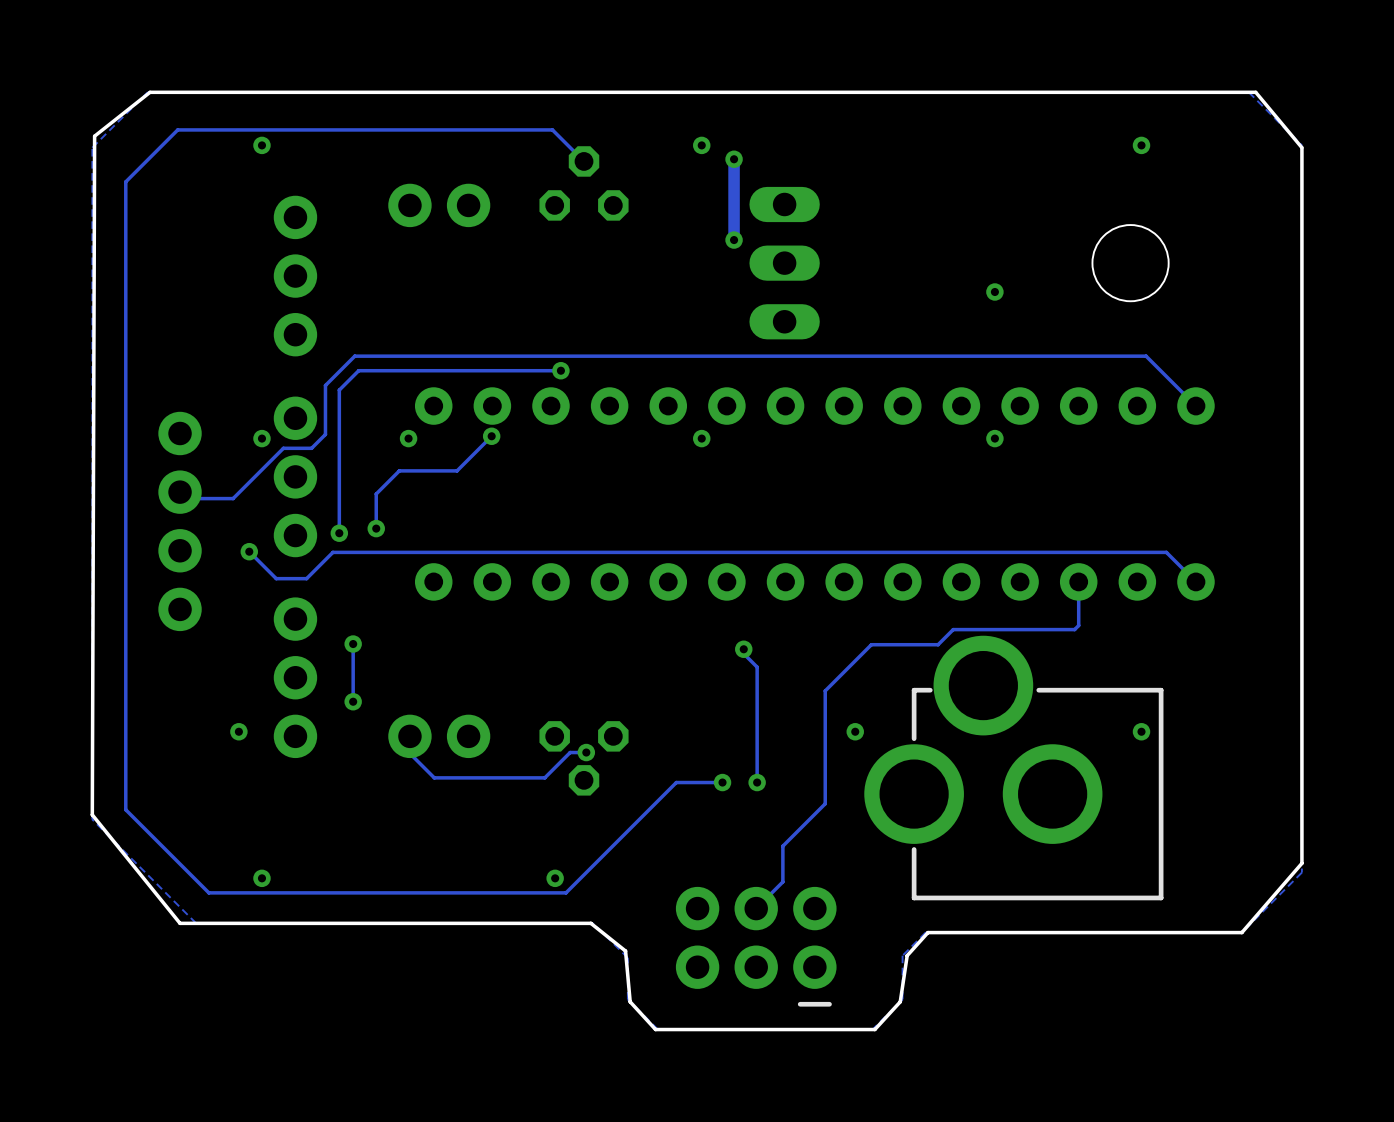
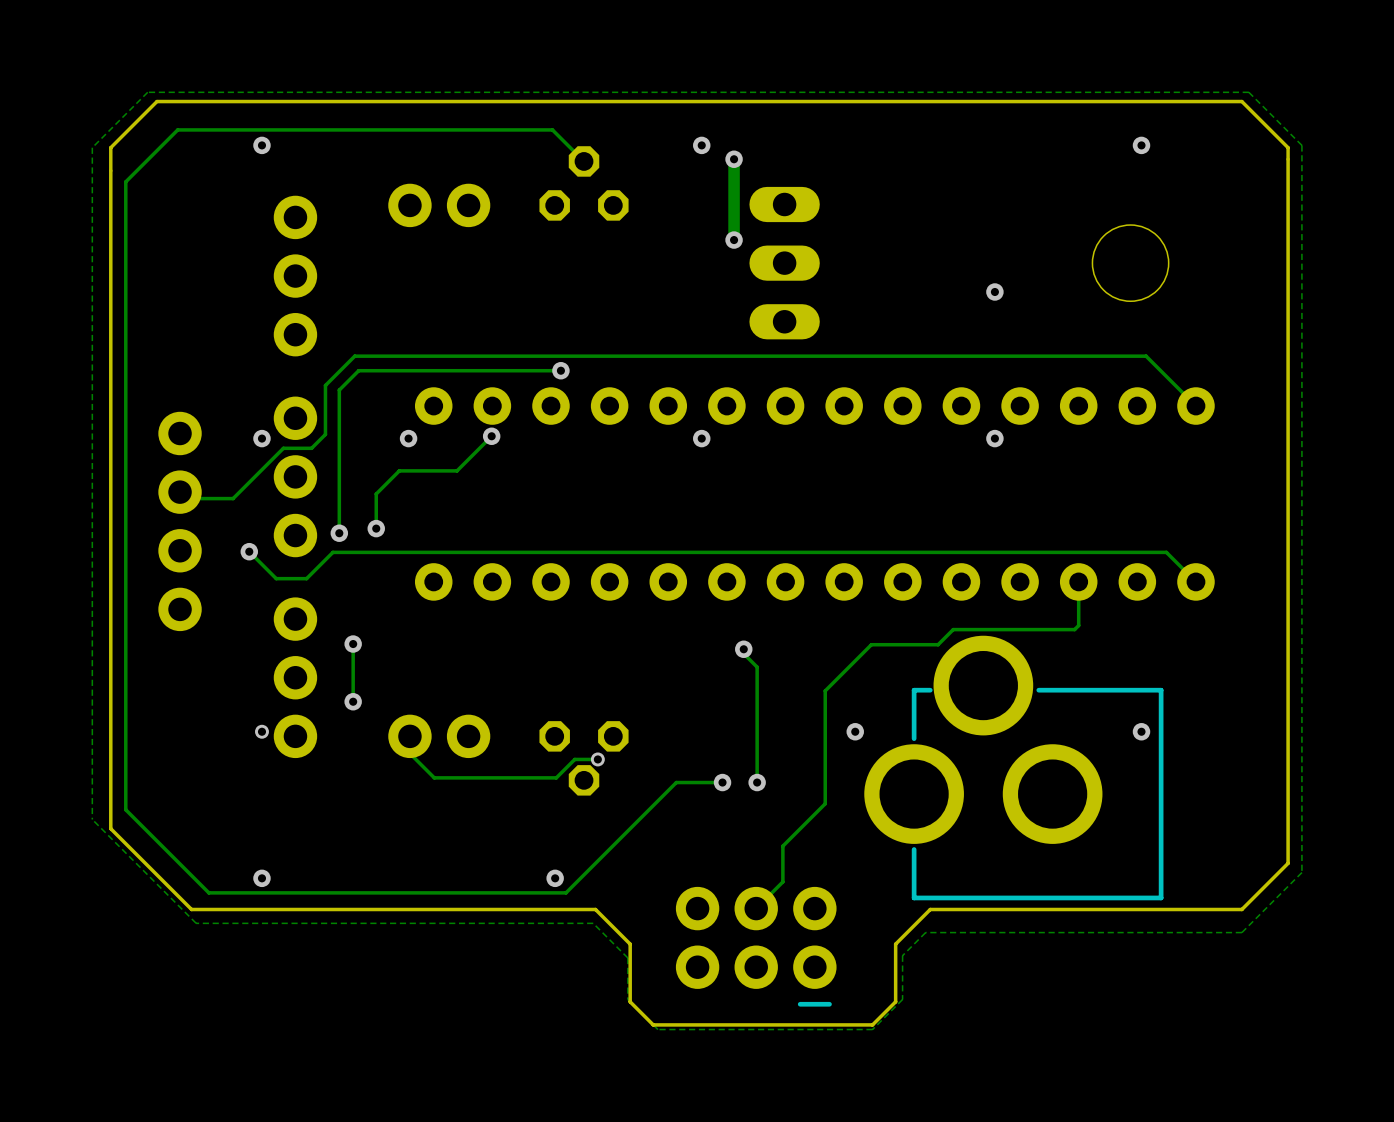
board edge: (1255, 92) (150, 92) (94, 136) (92, 814) (180, 923) (590, 923) (625, 951) (630, 1001) (655, 1029) (874, 1029) (900, 1001) (907, 955) (927, 932) (1241, 932) (1301, 863) (1301, 147) (1255, 92) -> (1241, 101) (1288, 147) (1288, 863) (1241, 909) (930, 909) (895, 944) (895, 1001) (872, 1024) (653, 1024) (630, 1001) (630, 944) (595, 909) (191, 909) (110, 828) (110, 147) (156, 101) (1241, 101)
via: (238, 731) -> none
via: none -> (261, 731)
track: (586, 752) (570, 752) (544, 777) -> (597, 759) (574, 759) (556, 777) (544, 777)
via position: (586, 752) -> (597, 759)

